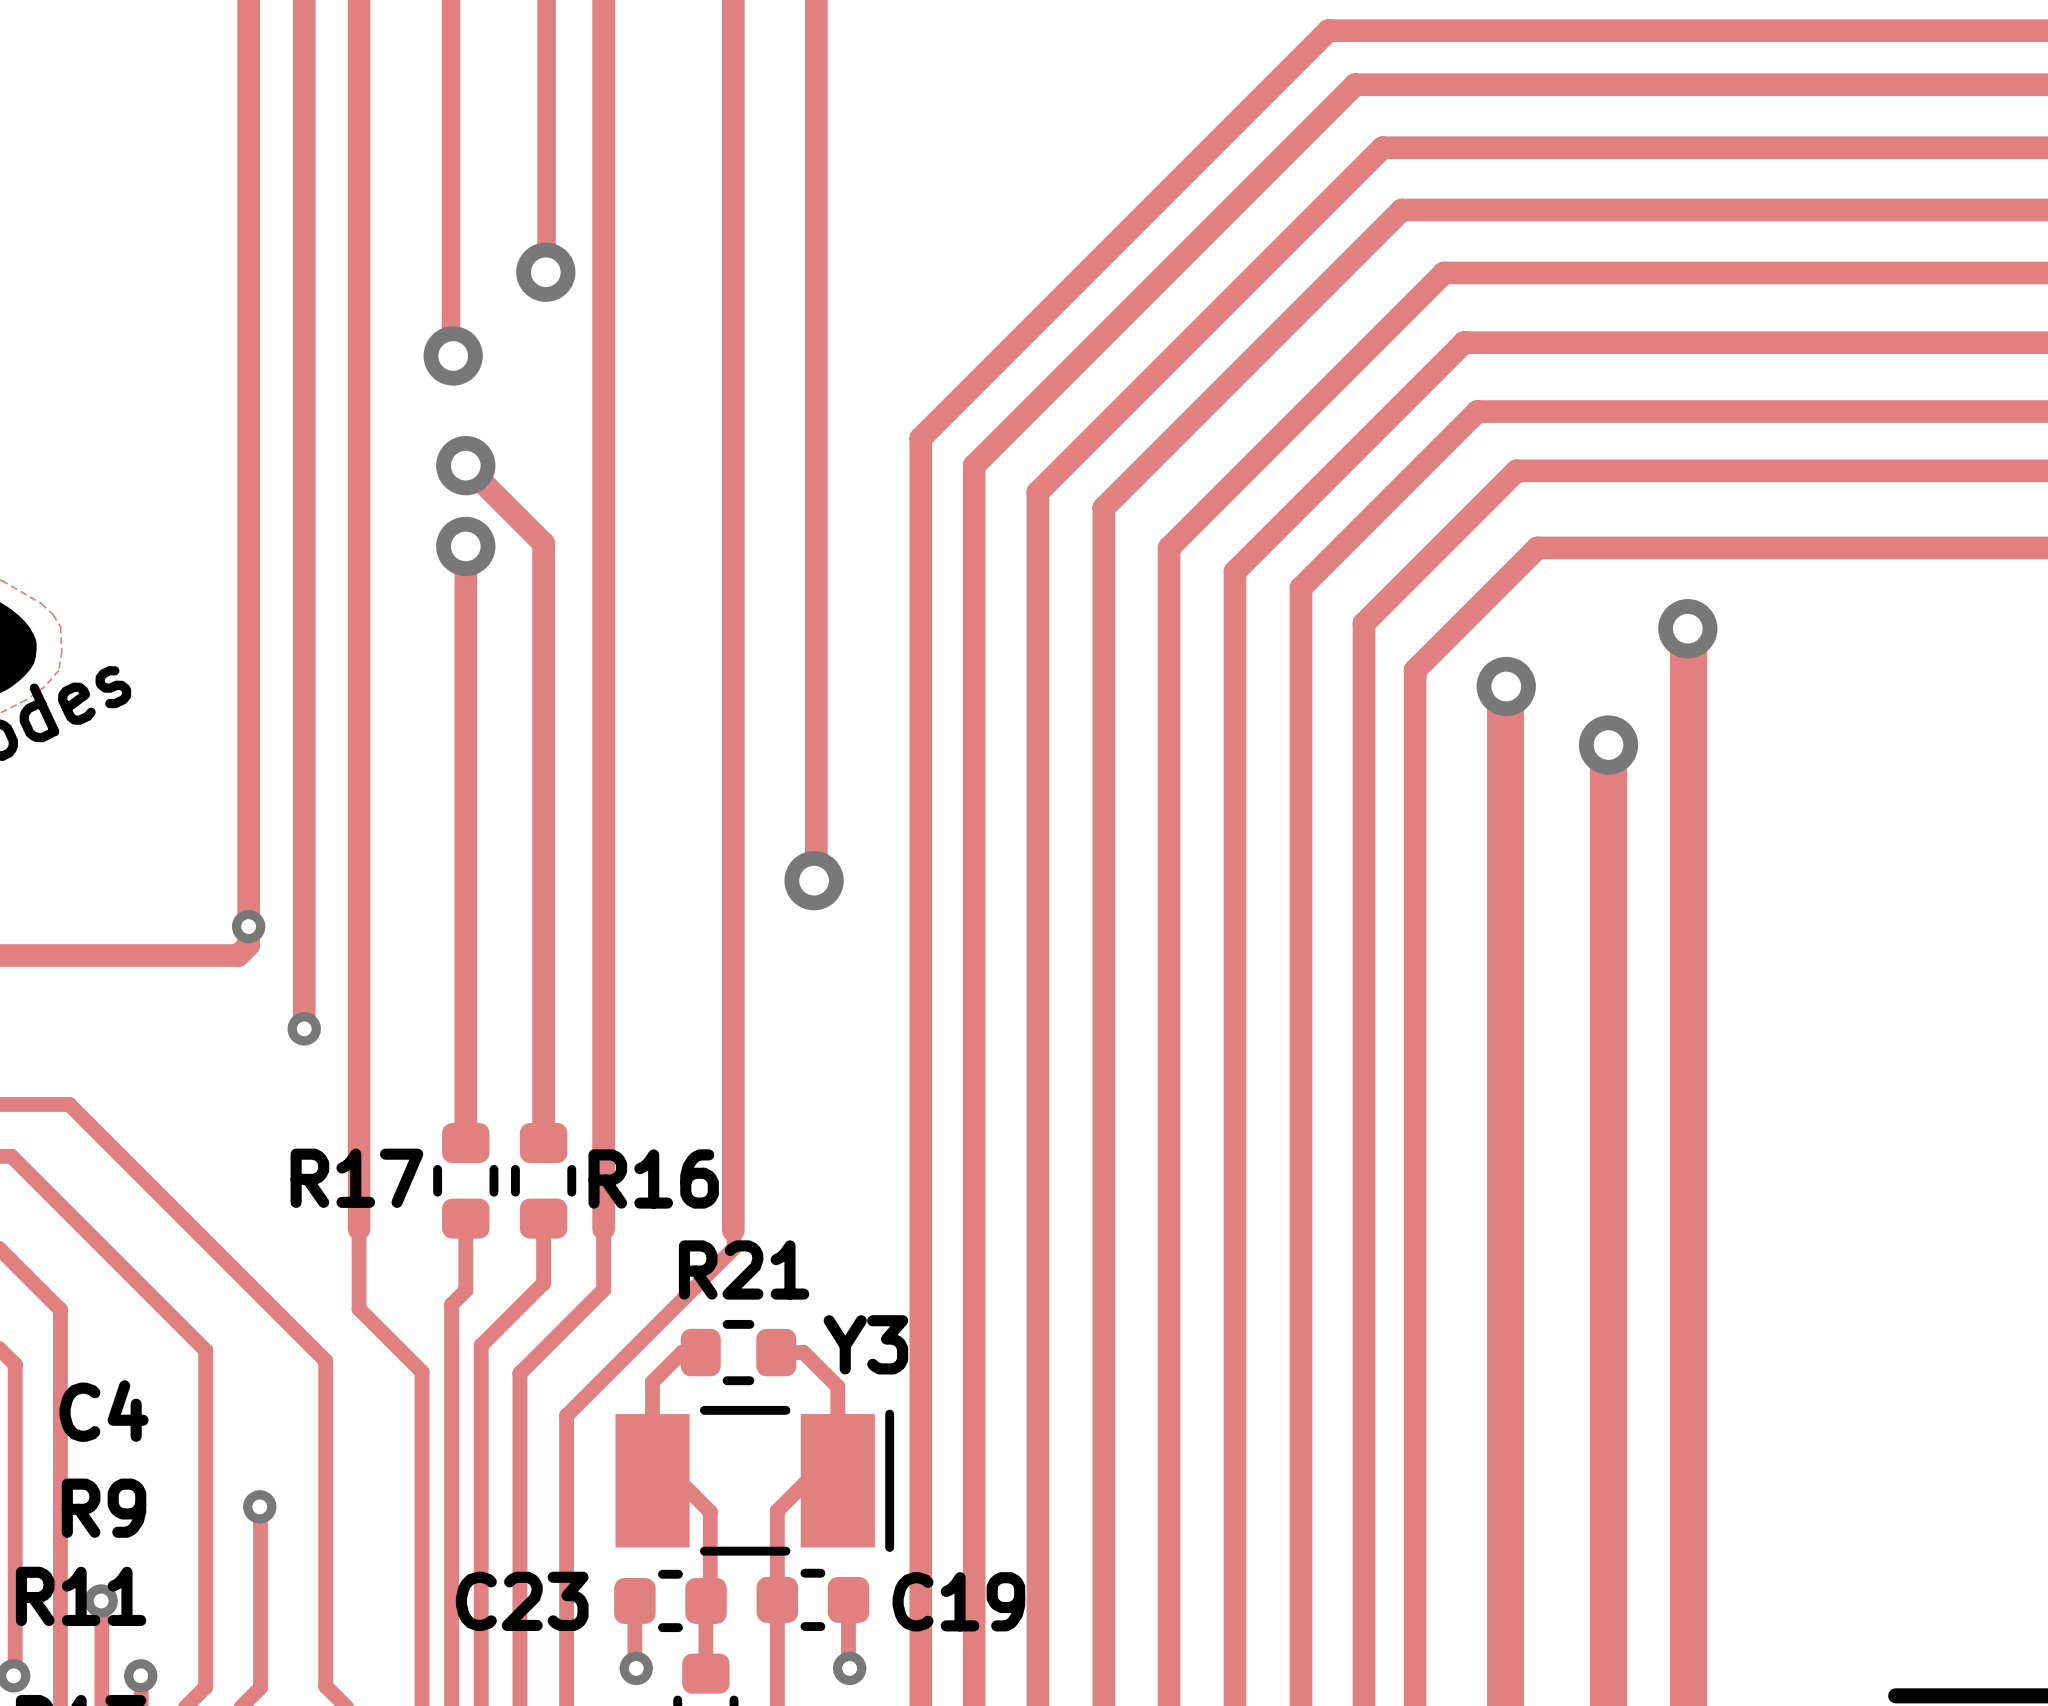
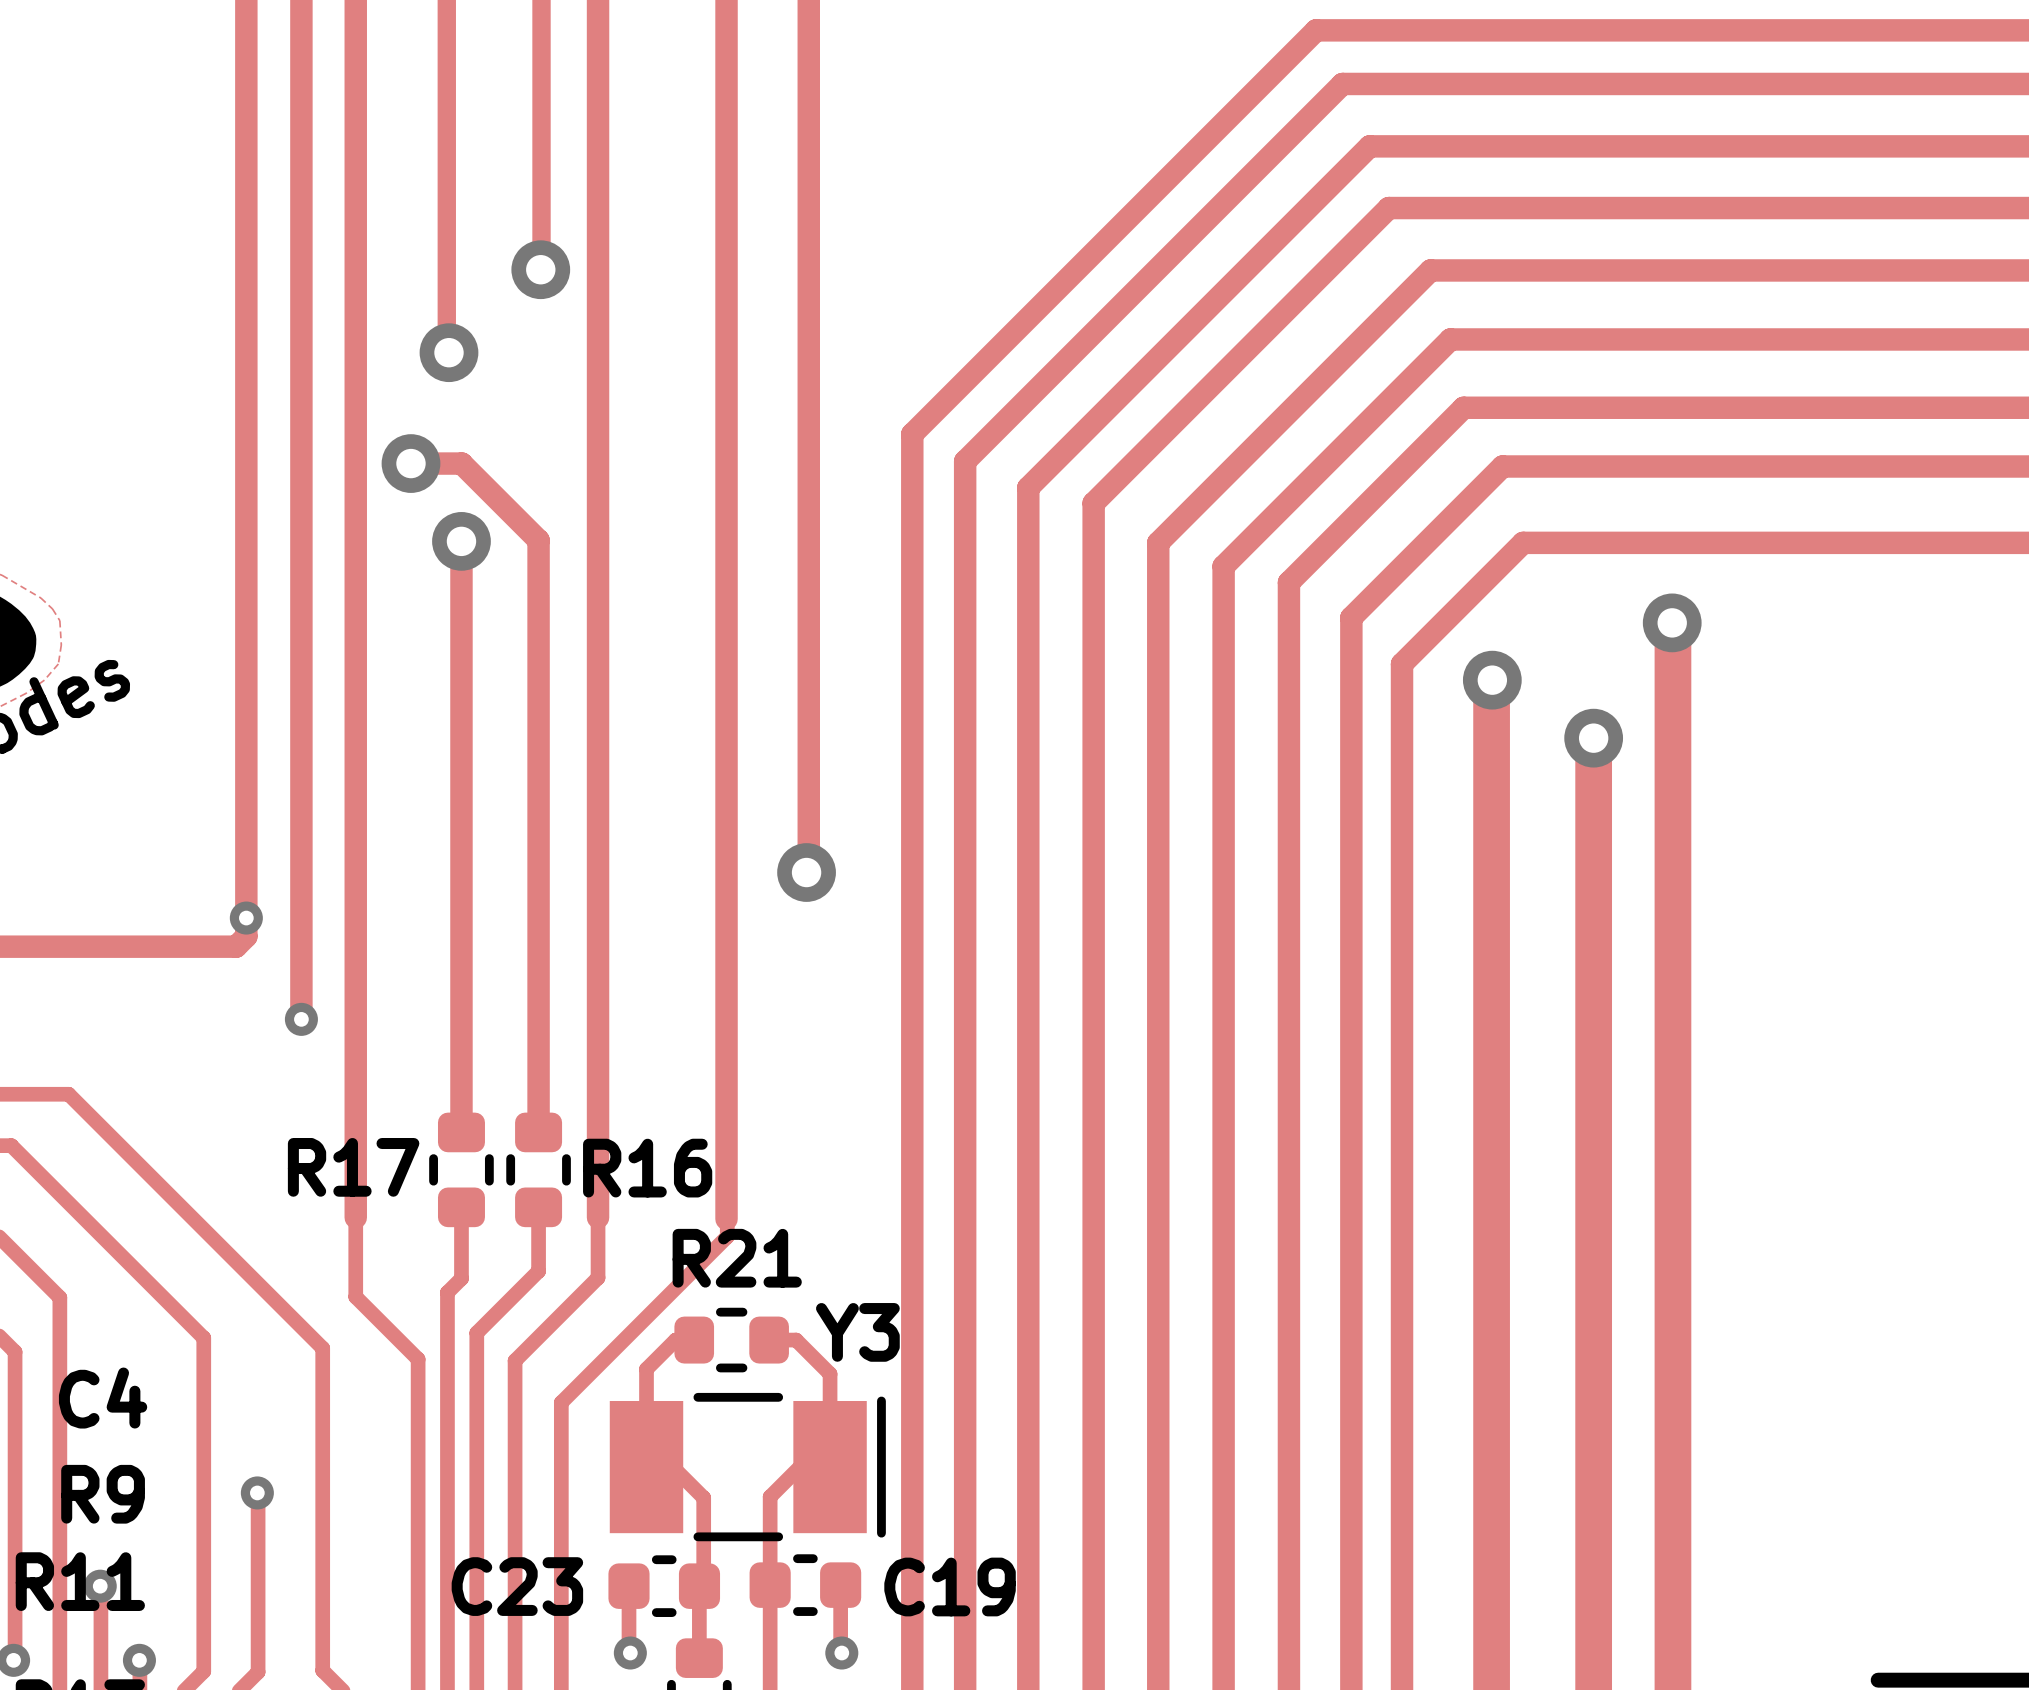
track: (465, 465) (543, 545) -> (410, 463) (461, 463) (538, 540)
via position: (465, 465) -> (410, 463)

